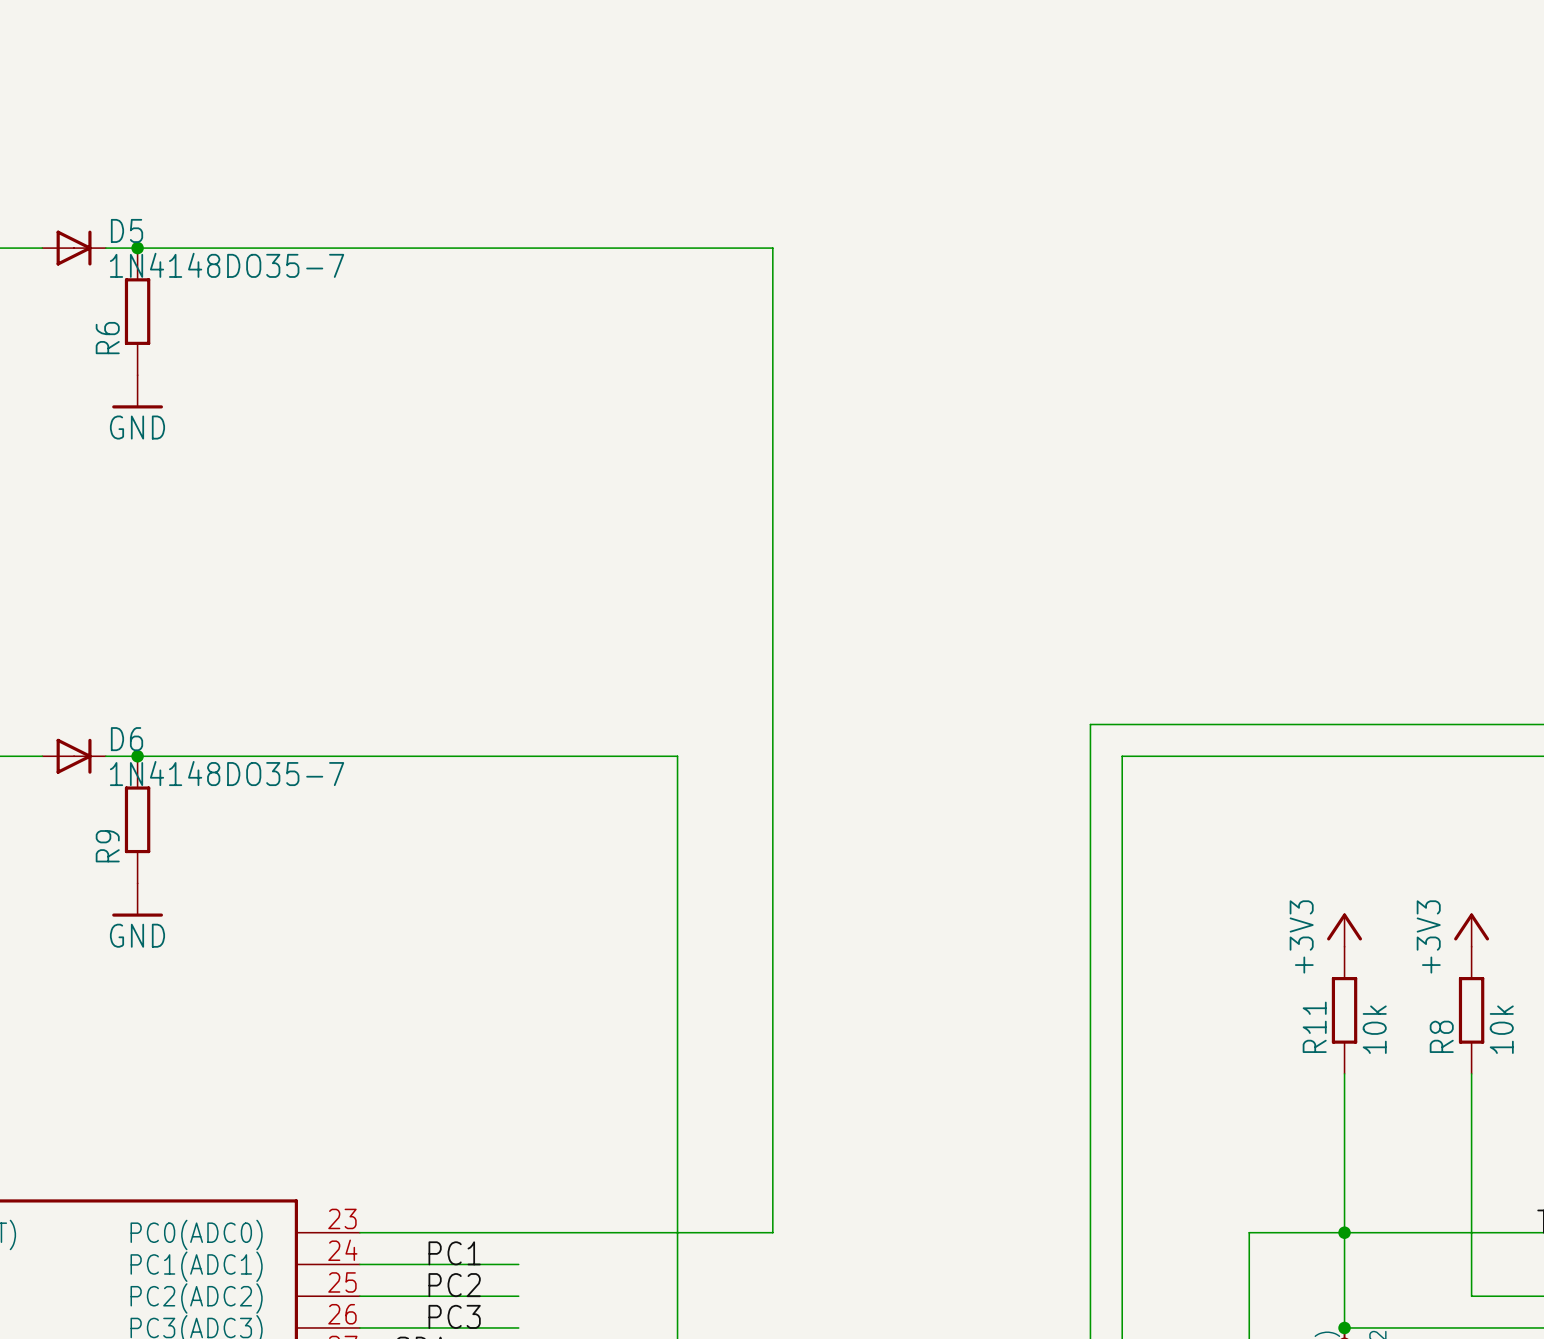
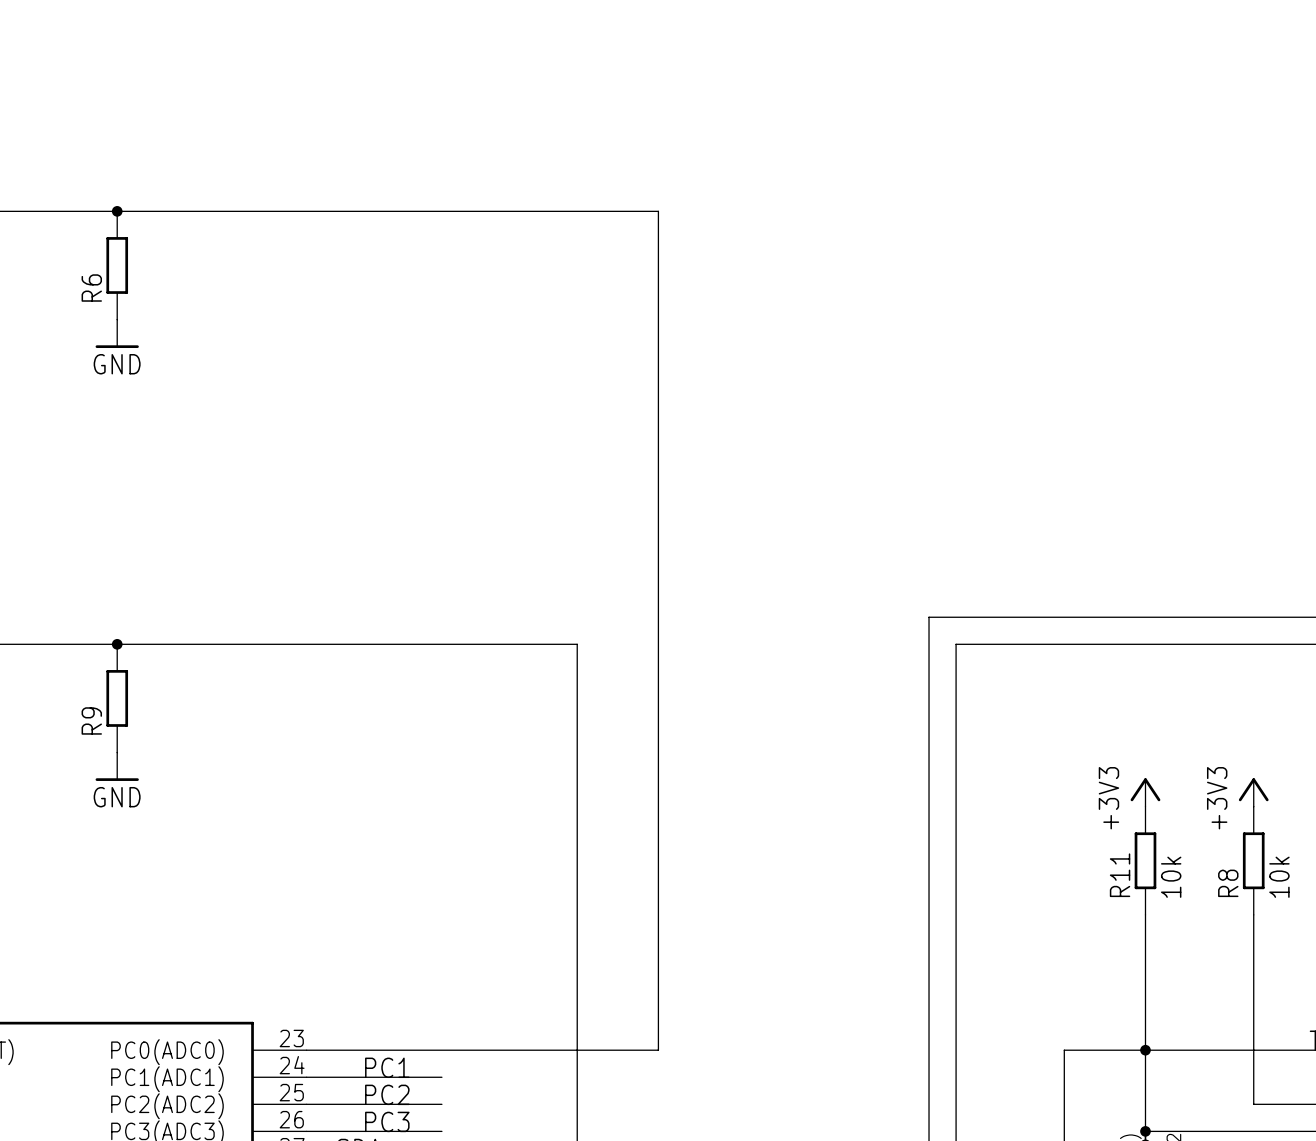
D5: 1N4148DO35-7 (74, 248) -> none
D6: 1N4148DO35-7 (74, 756) -> none

